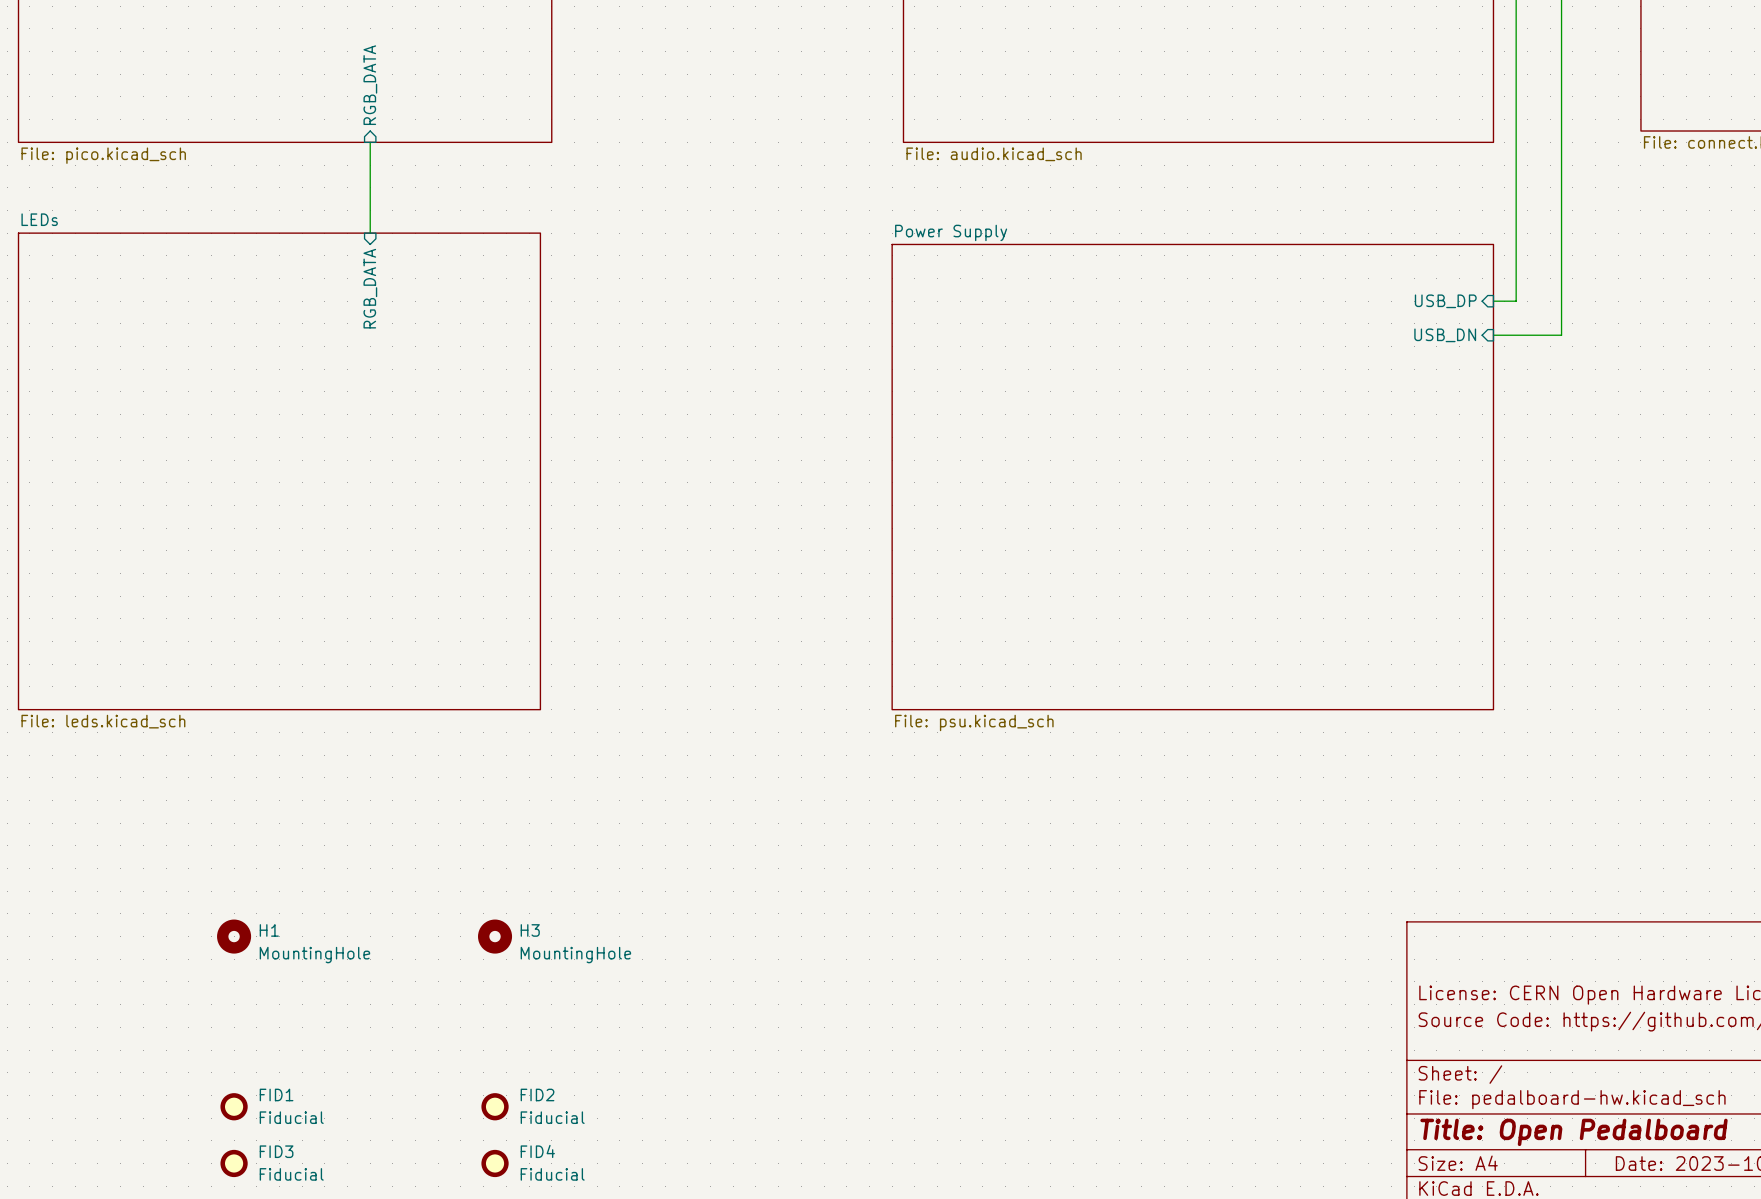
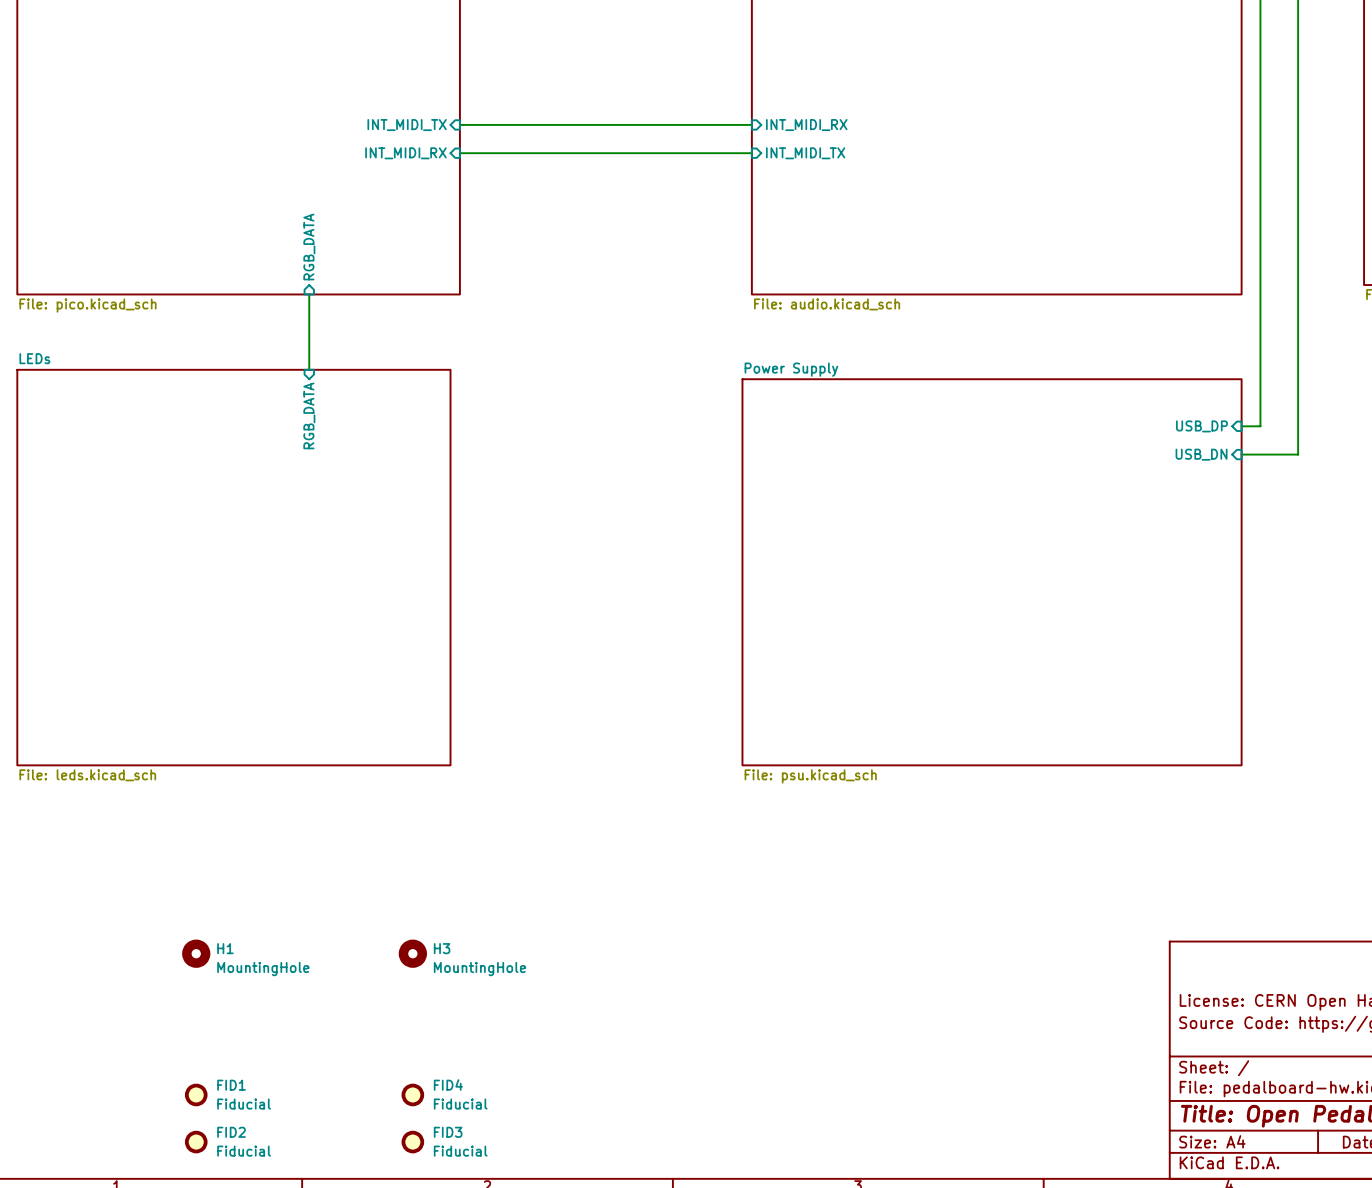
FID2 name: FID2 (537, 1094) -> FID4 (448, 1084)
FID3 name: FID3 (276, 1151) -> FID2 (231, 1132)
FID4 name: FID4 (537, 1151) -> FID3 (448, 1132)

